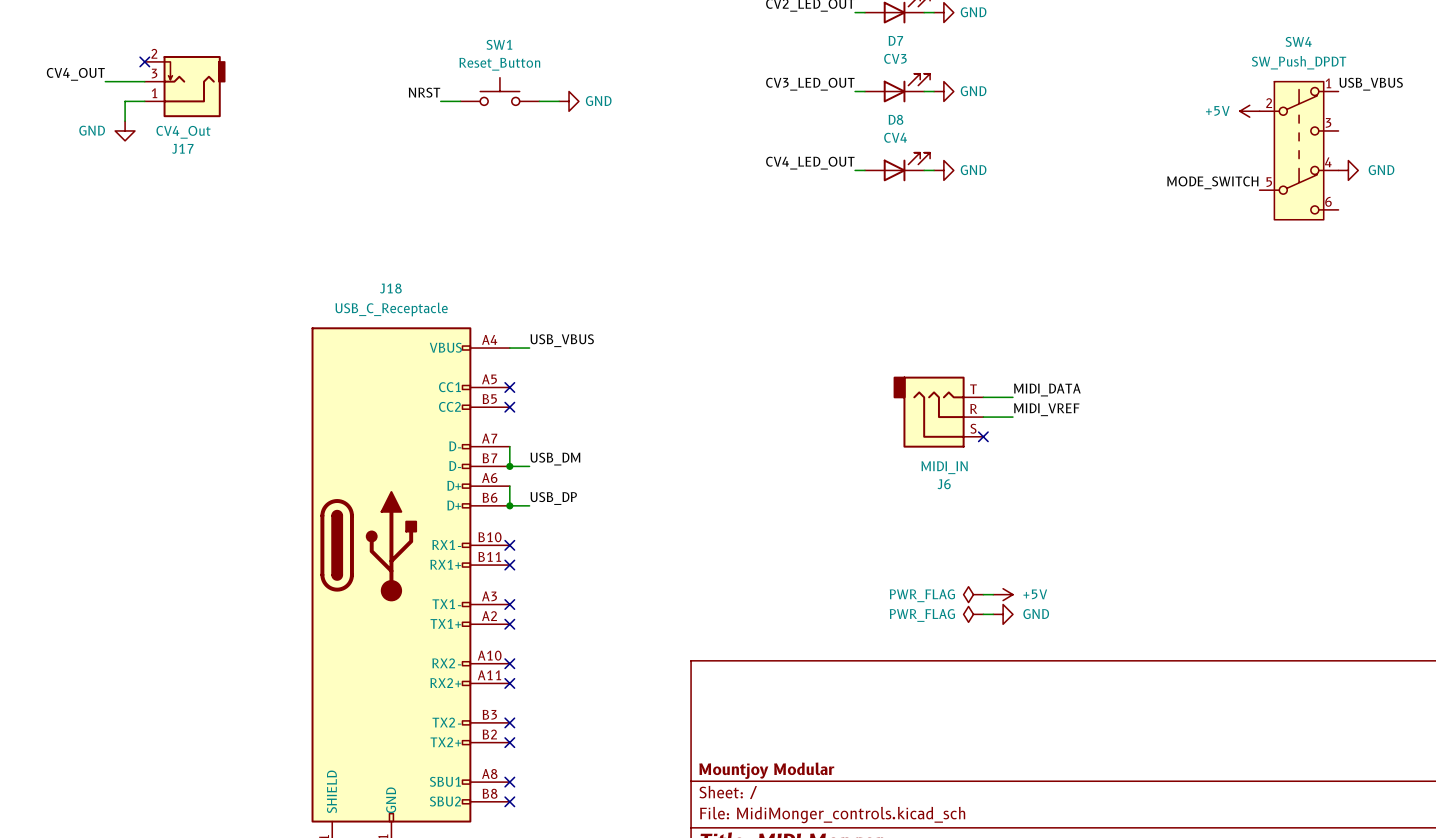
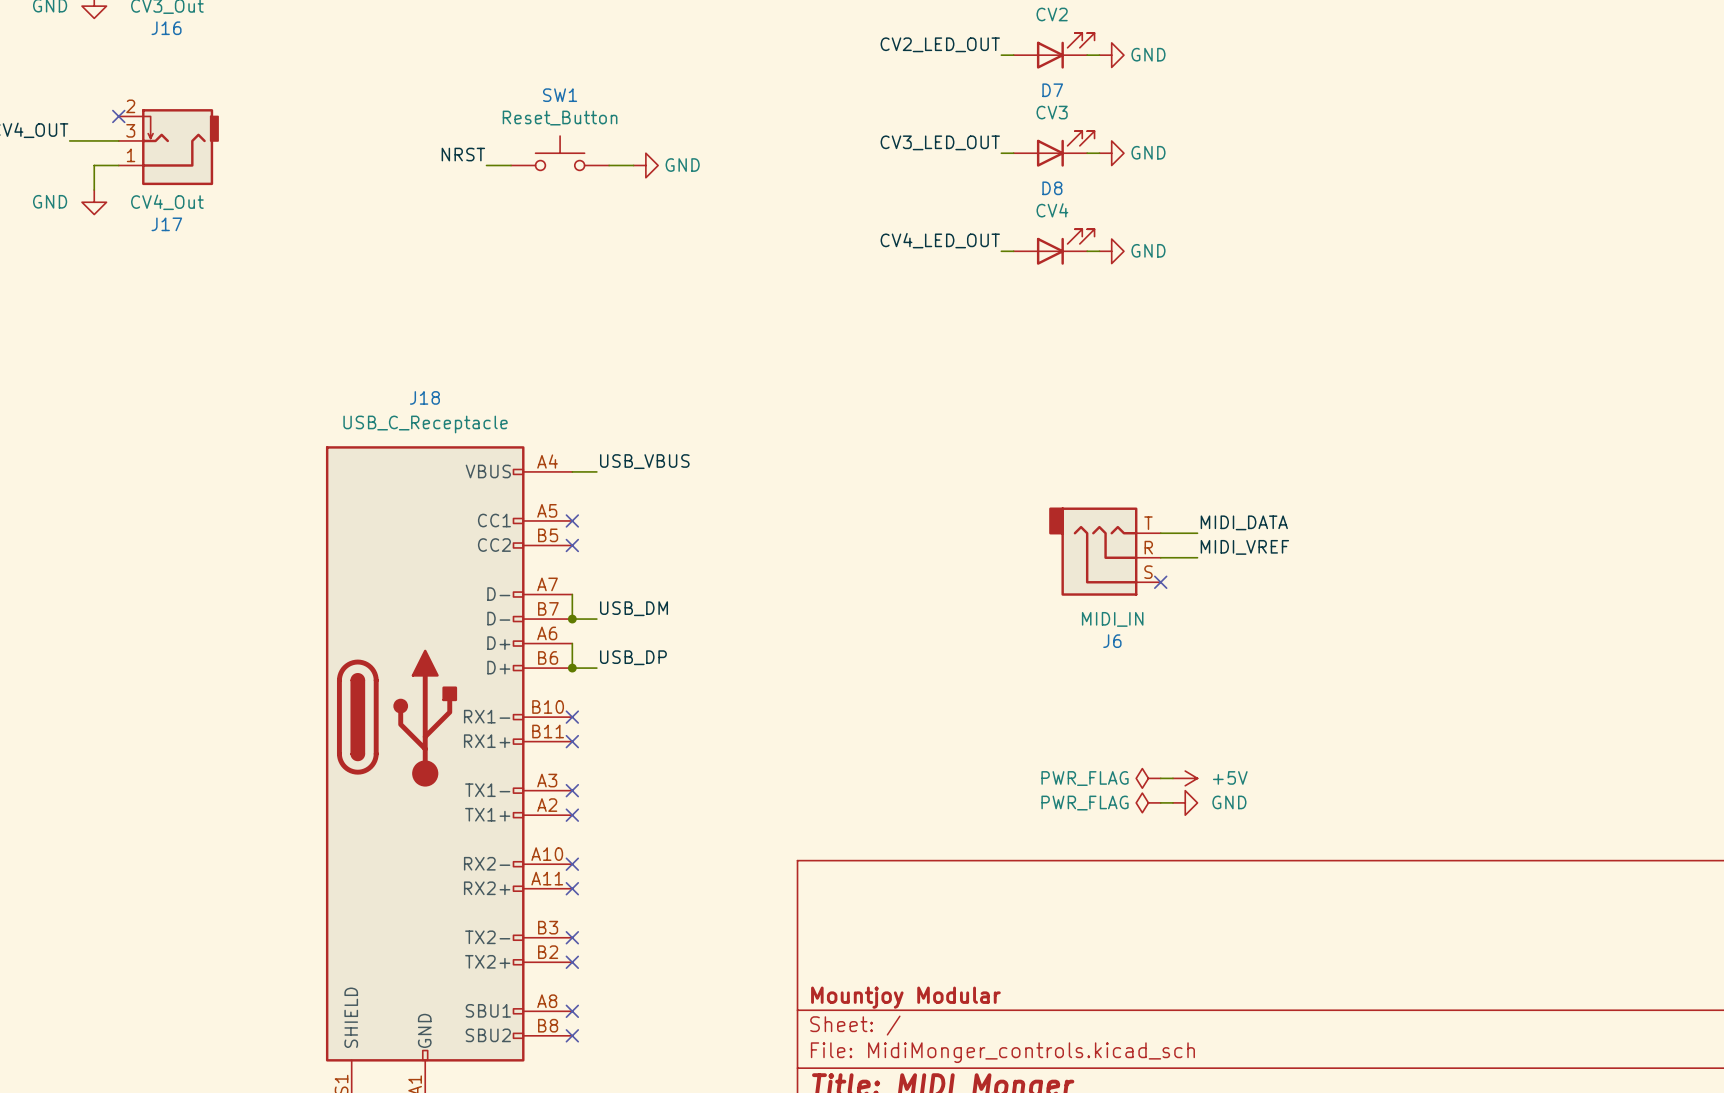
label: USB_VBUS (1371, 84) -> none
power symbol: +5V (1249, 111) -> none
SW4: SW_Push_DPDT (1299, 150) -> none
power symbol: GND (1348, 170) -> none
label: MODE_SWITCH (1212, 182) -> none

